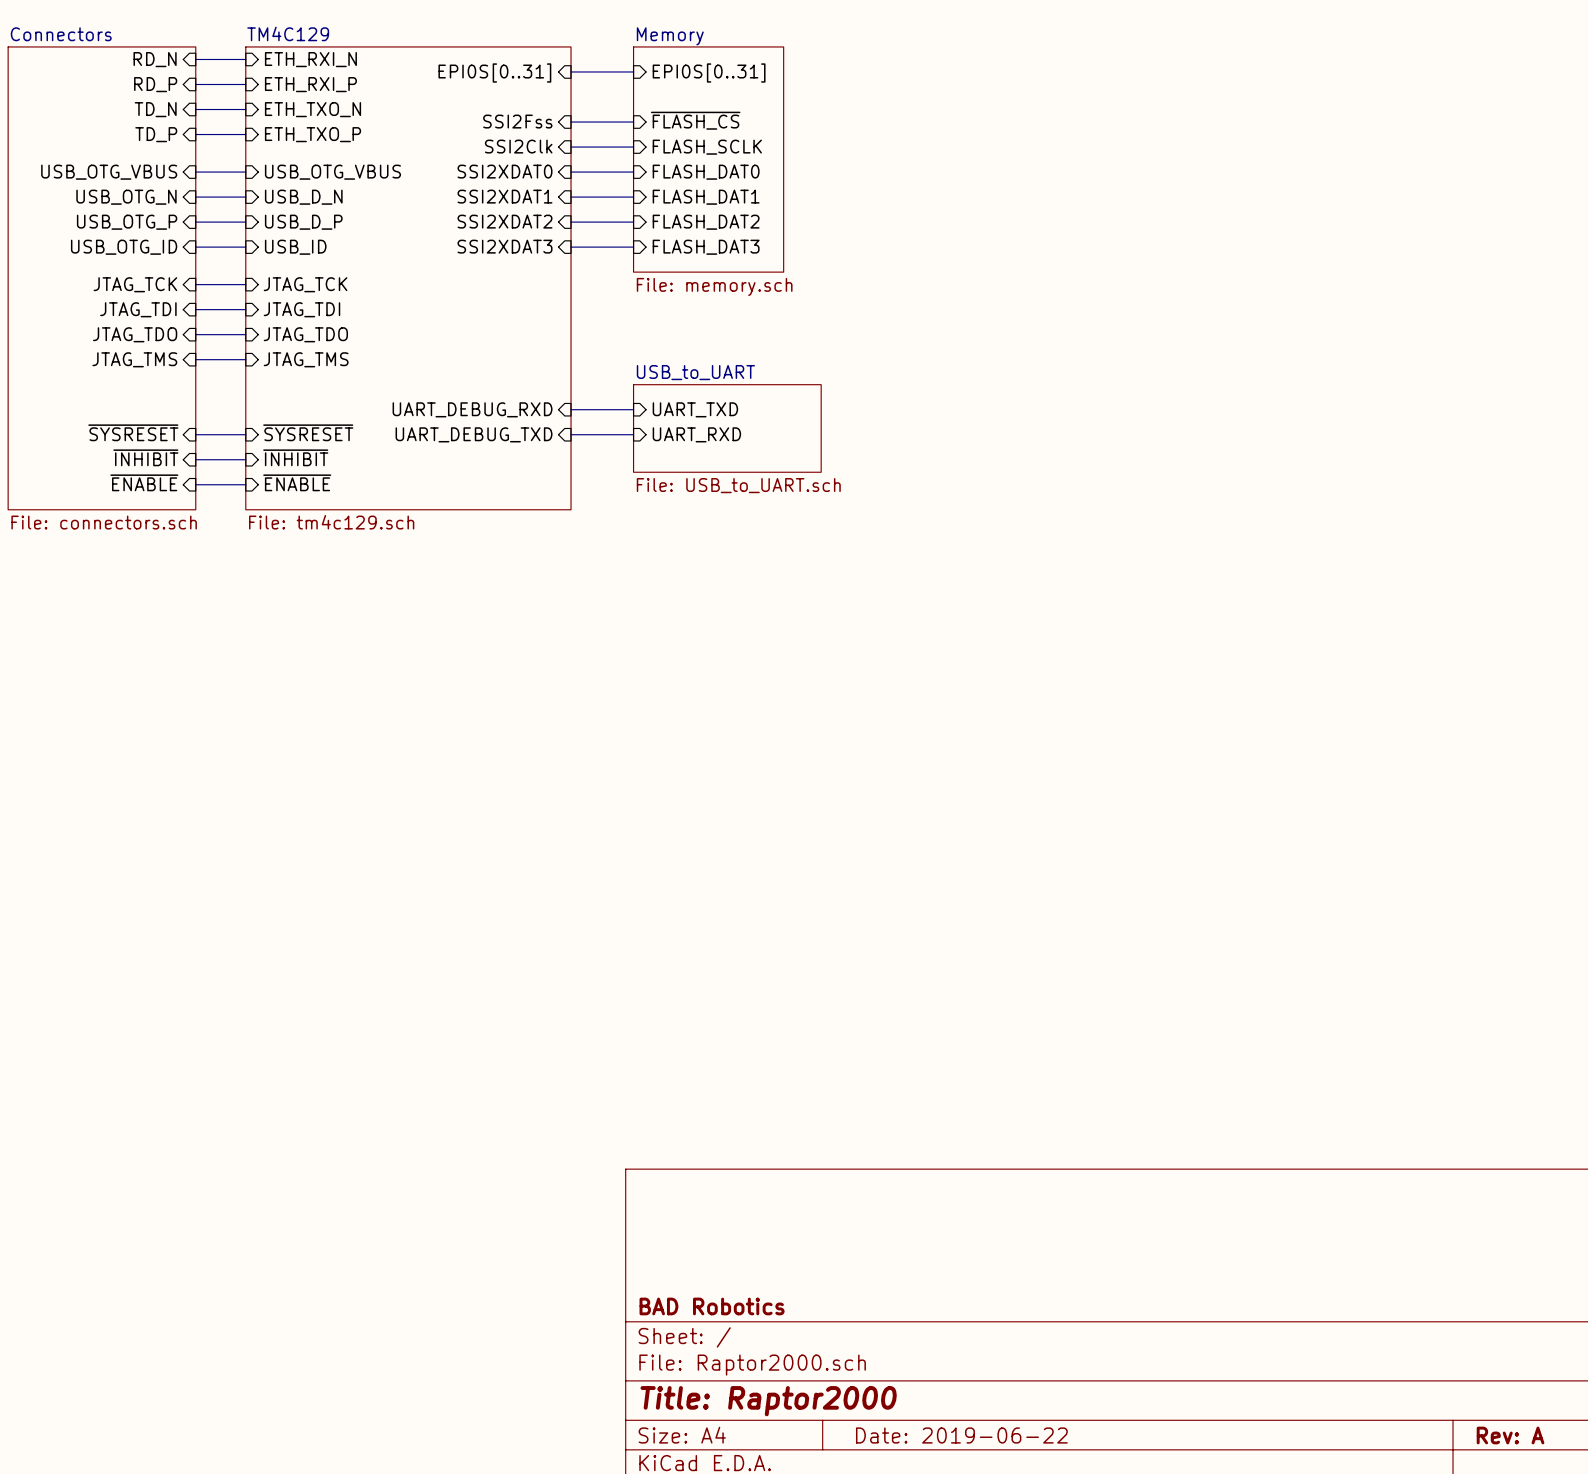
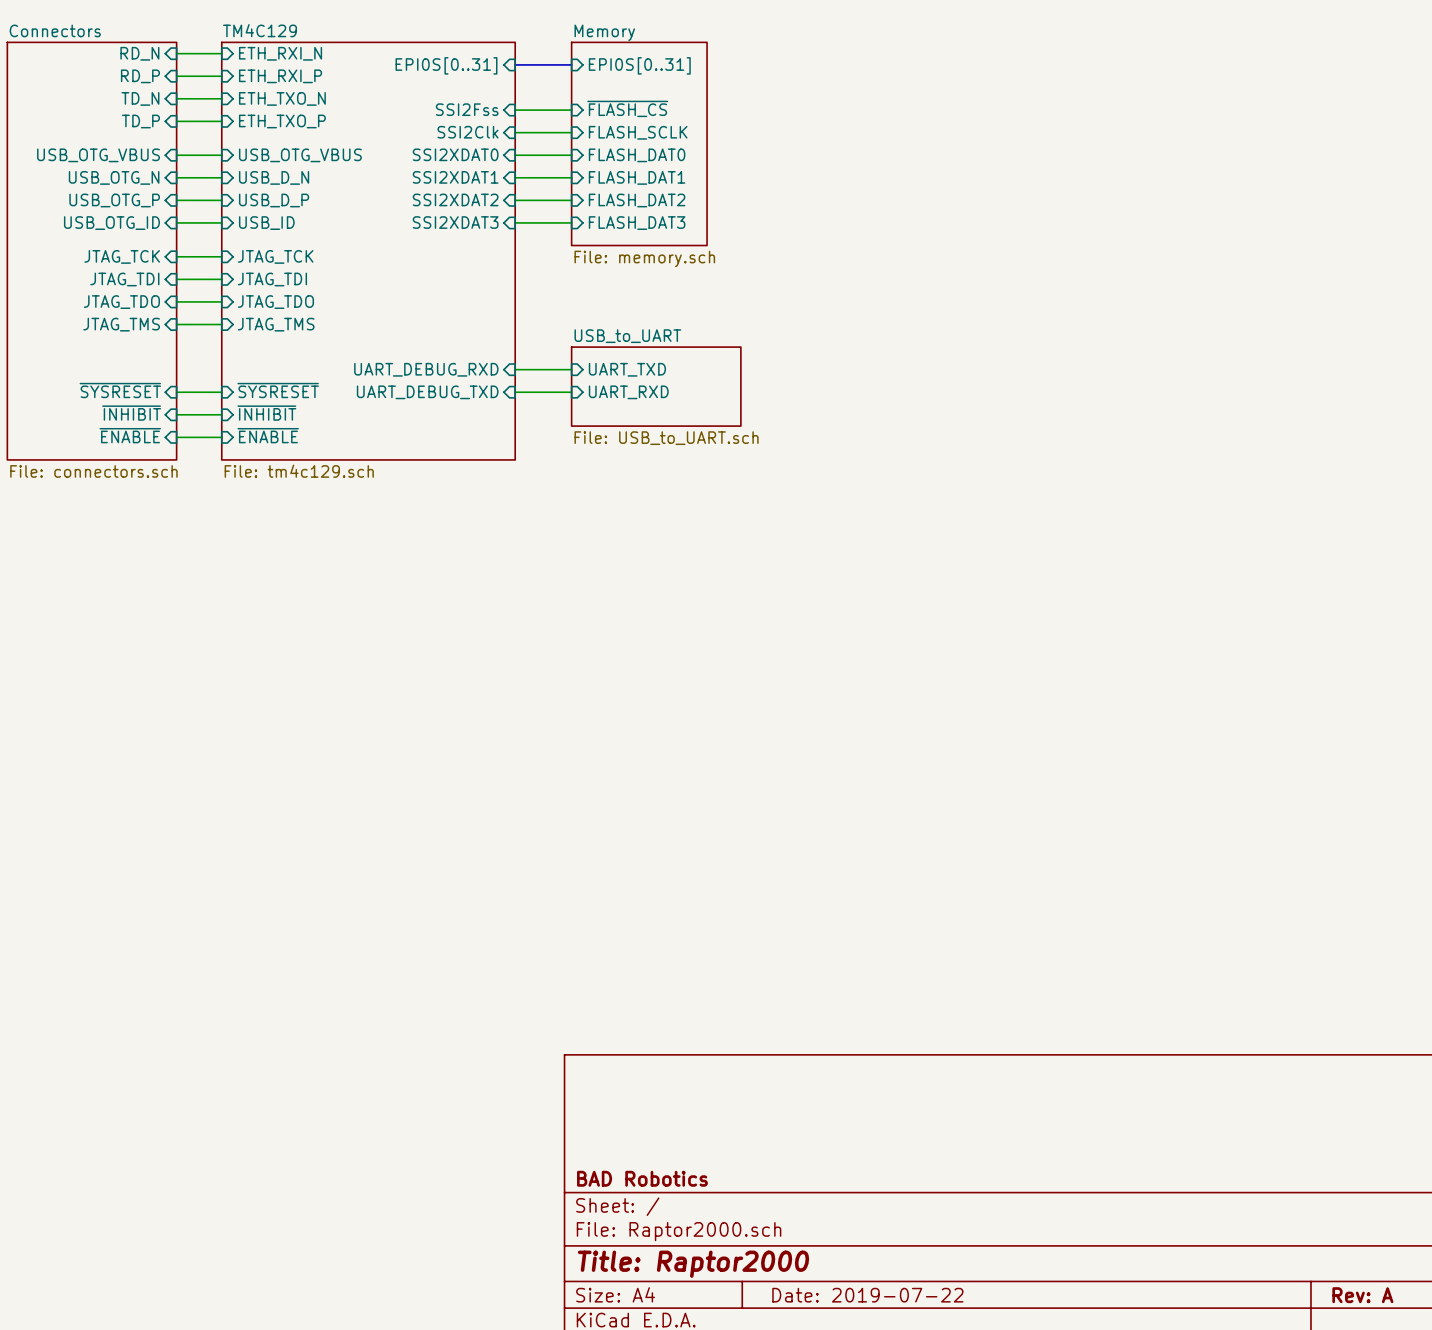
title block: Date: 2019-06-22 (961, 1435) -> Date: 2019-07-22 (867, 1295)

